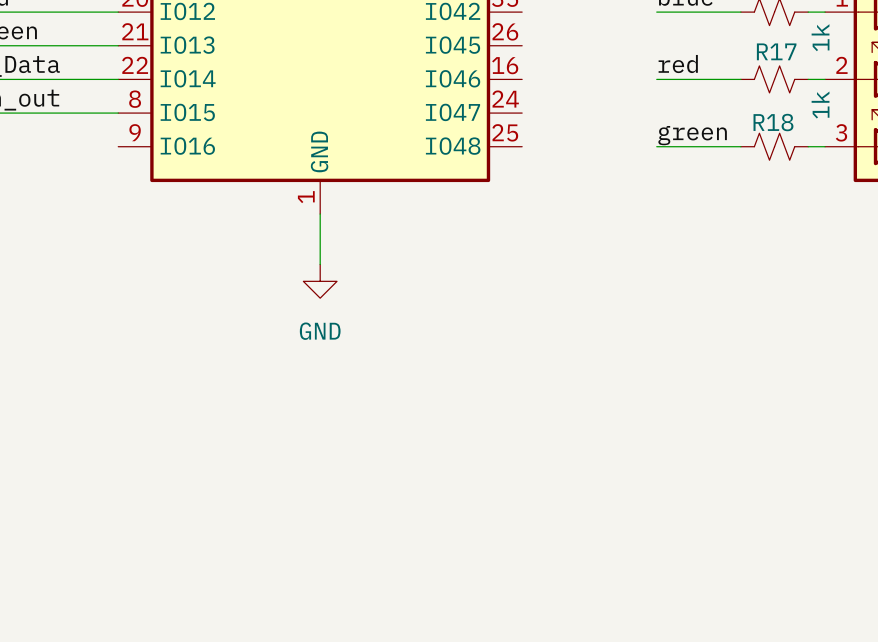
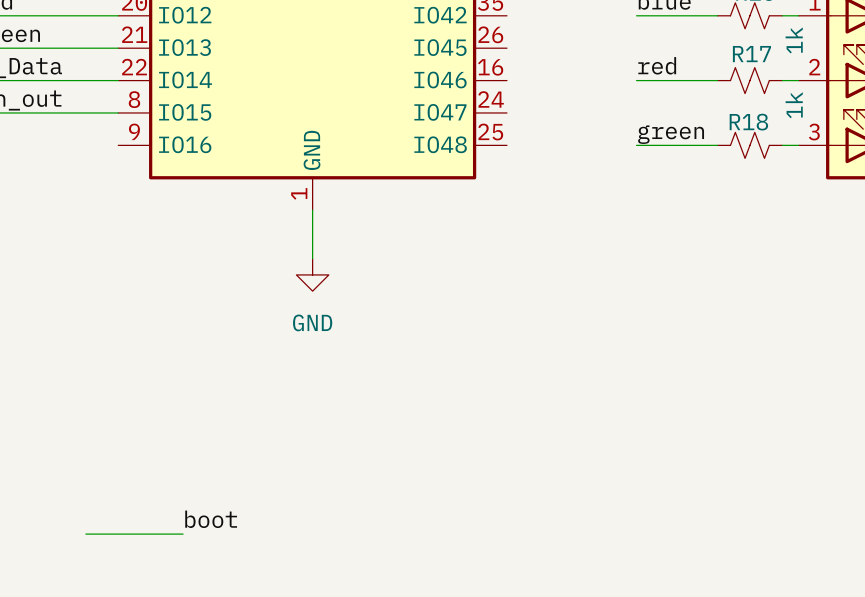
label: none -> boot (211, 519)
wire: none -> (85, 534) (183, 534)

